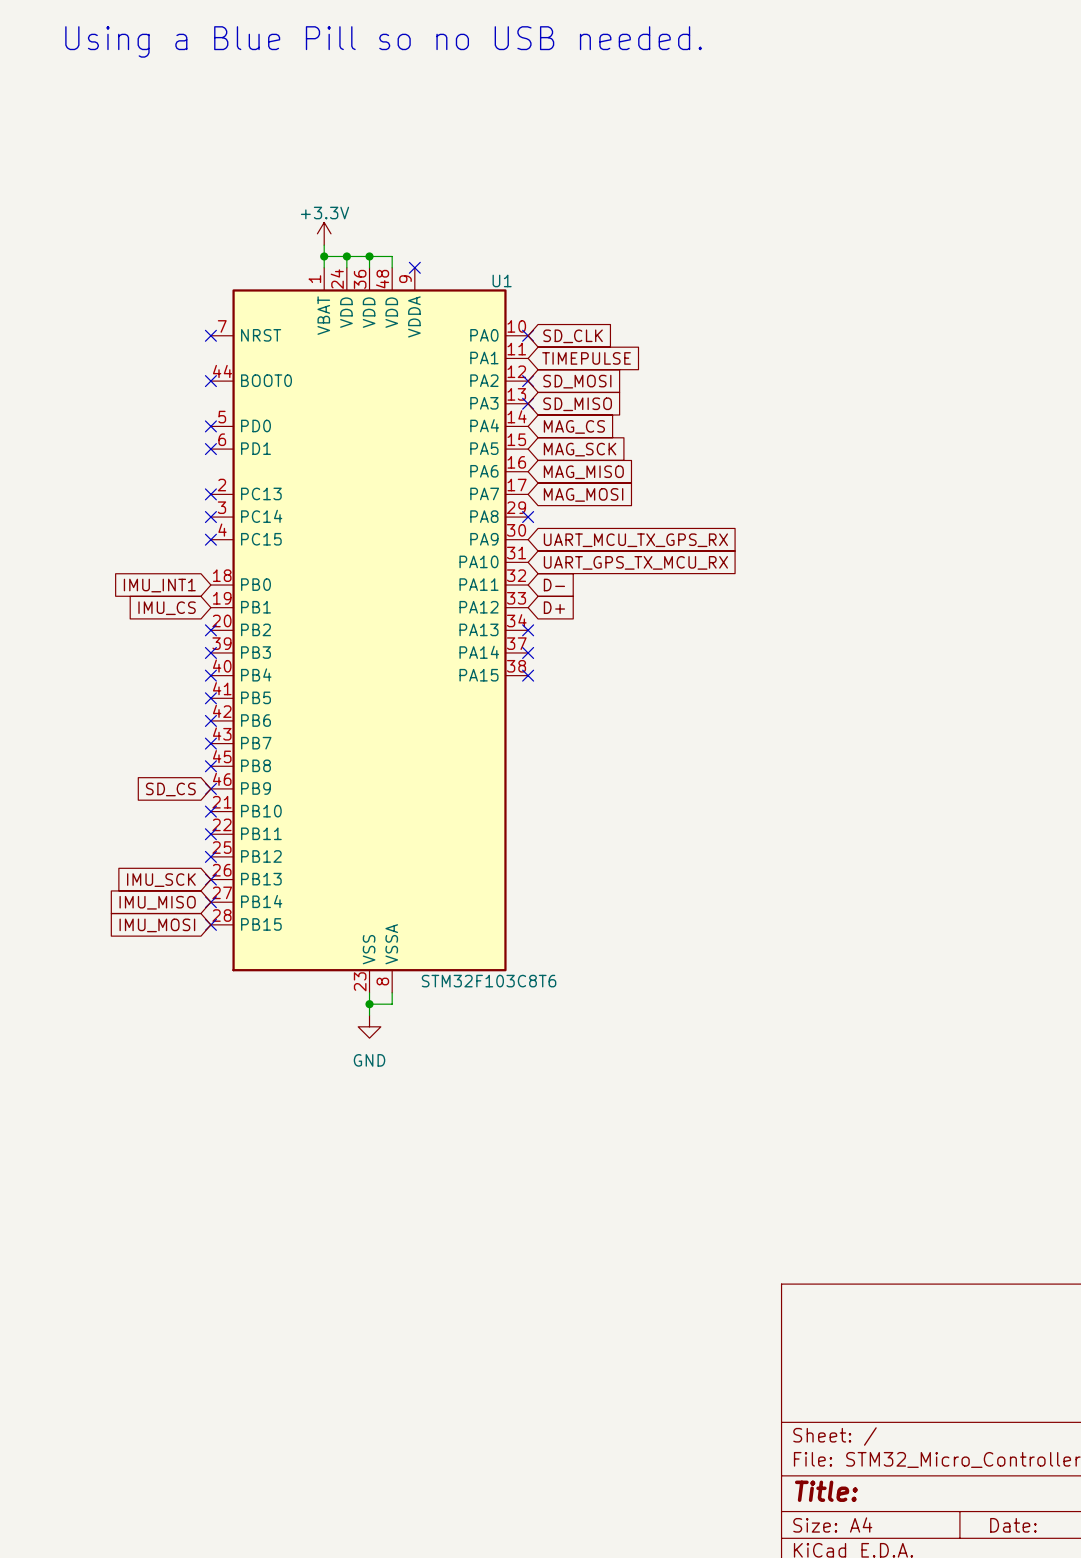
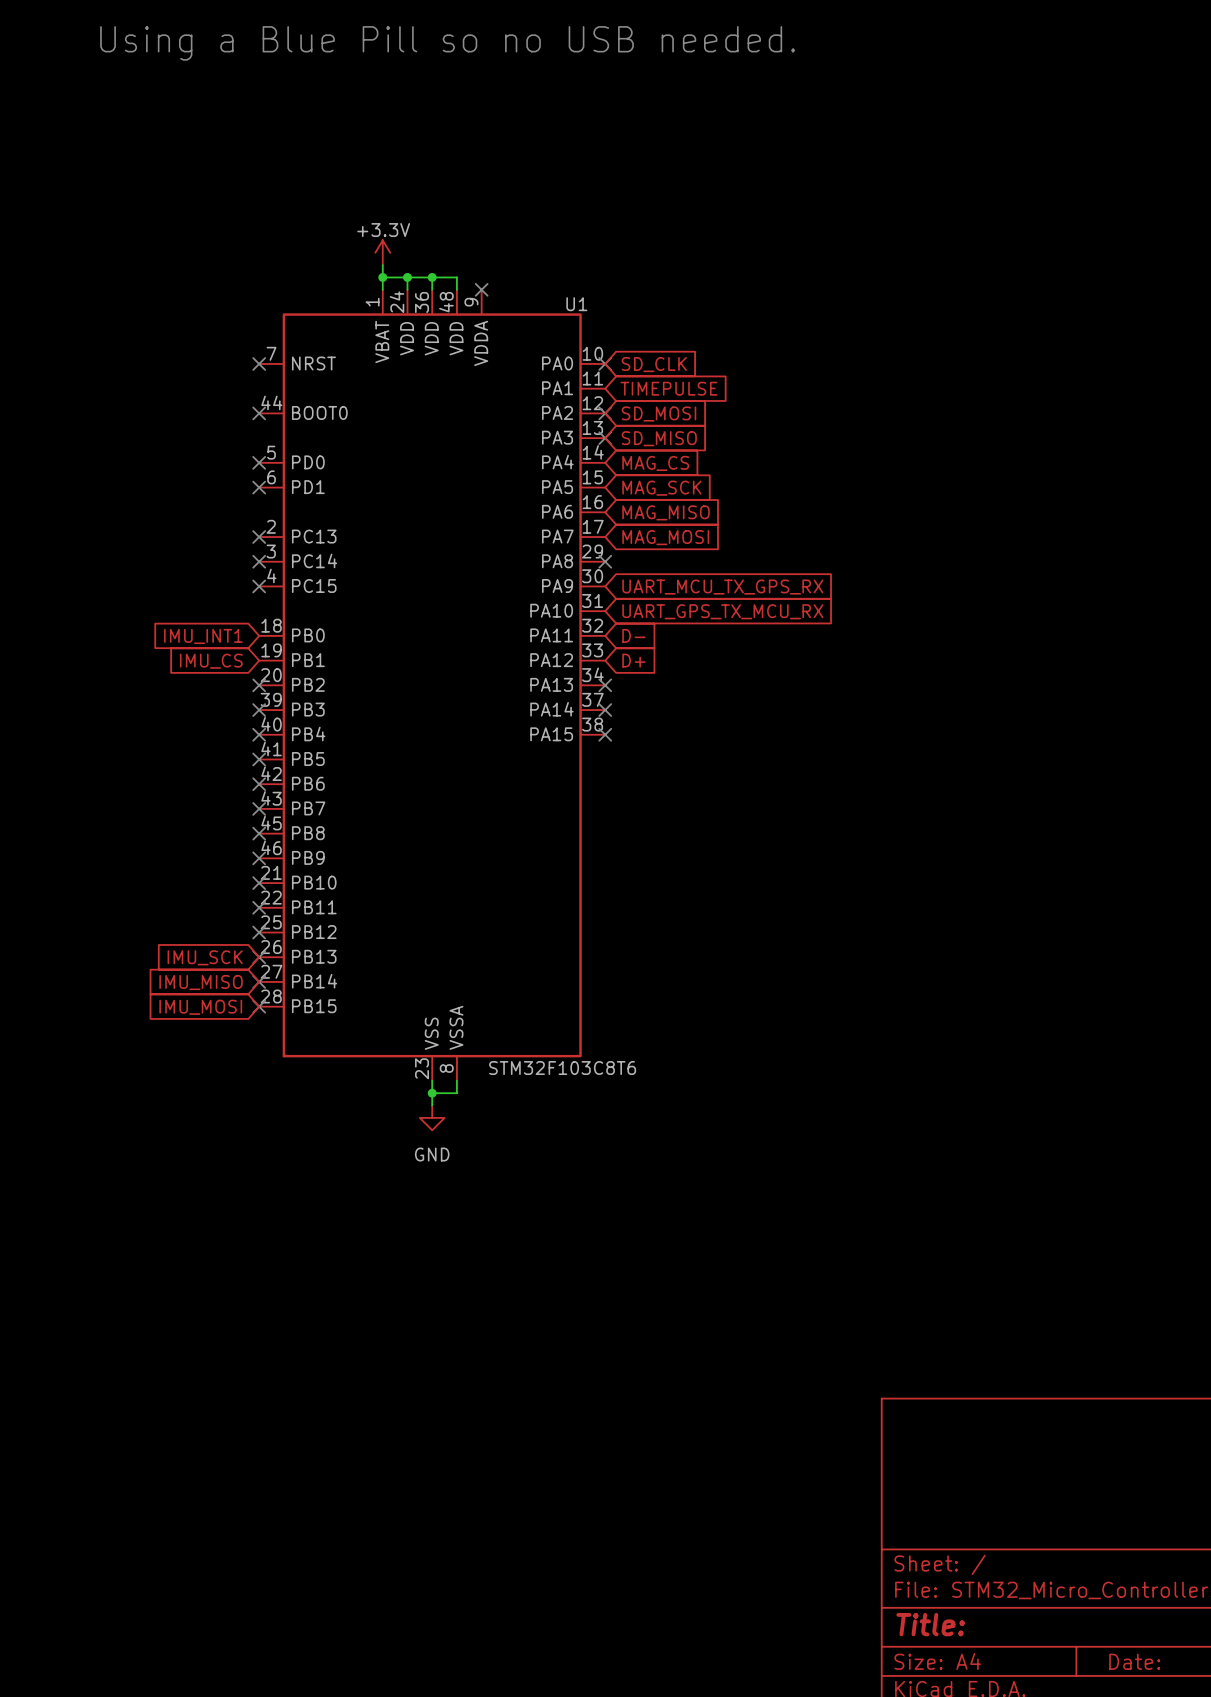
global label: SD_CS (170, 789) -> none

